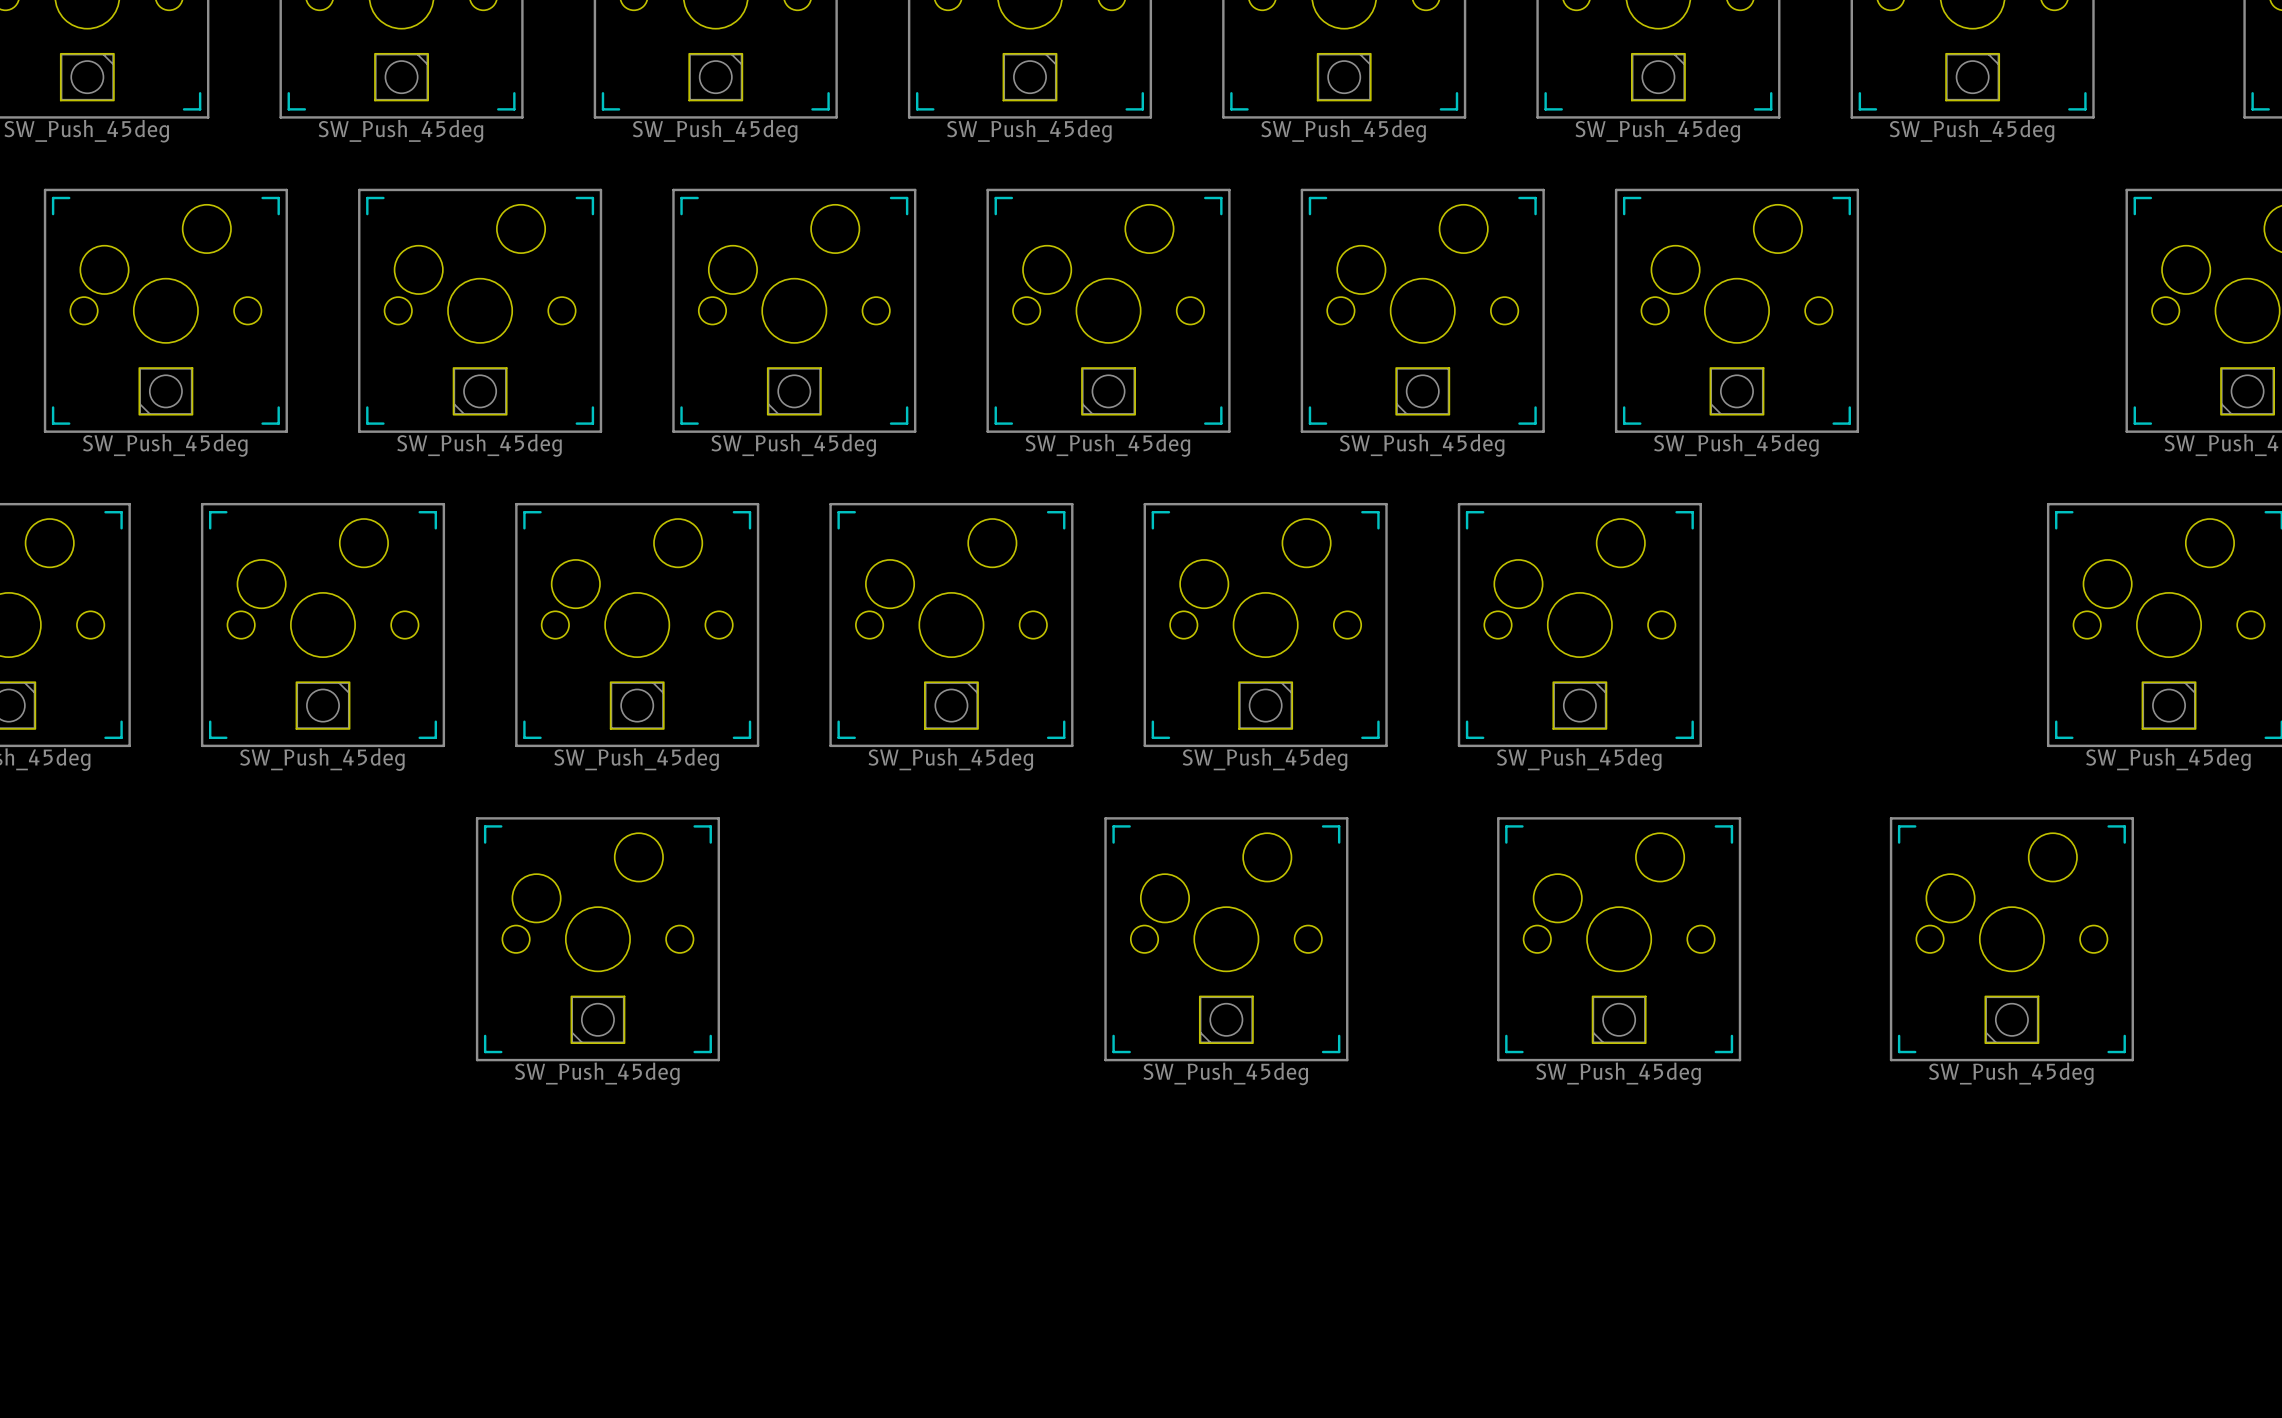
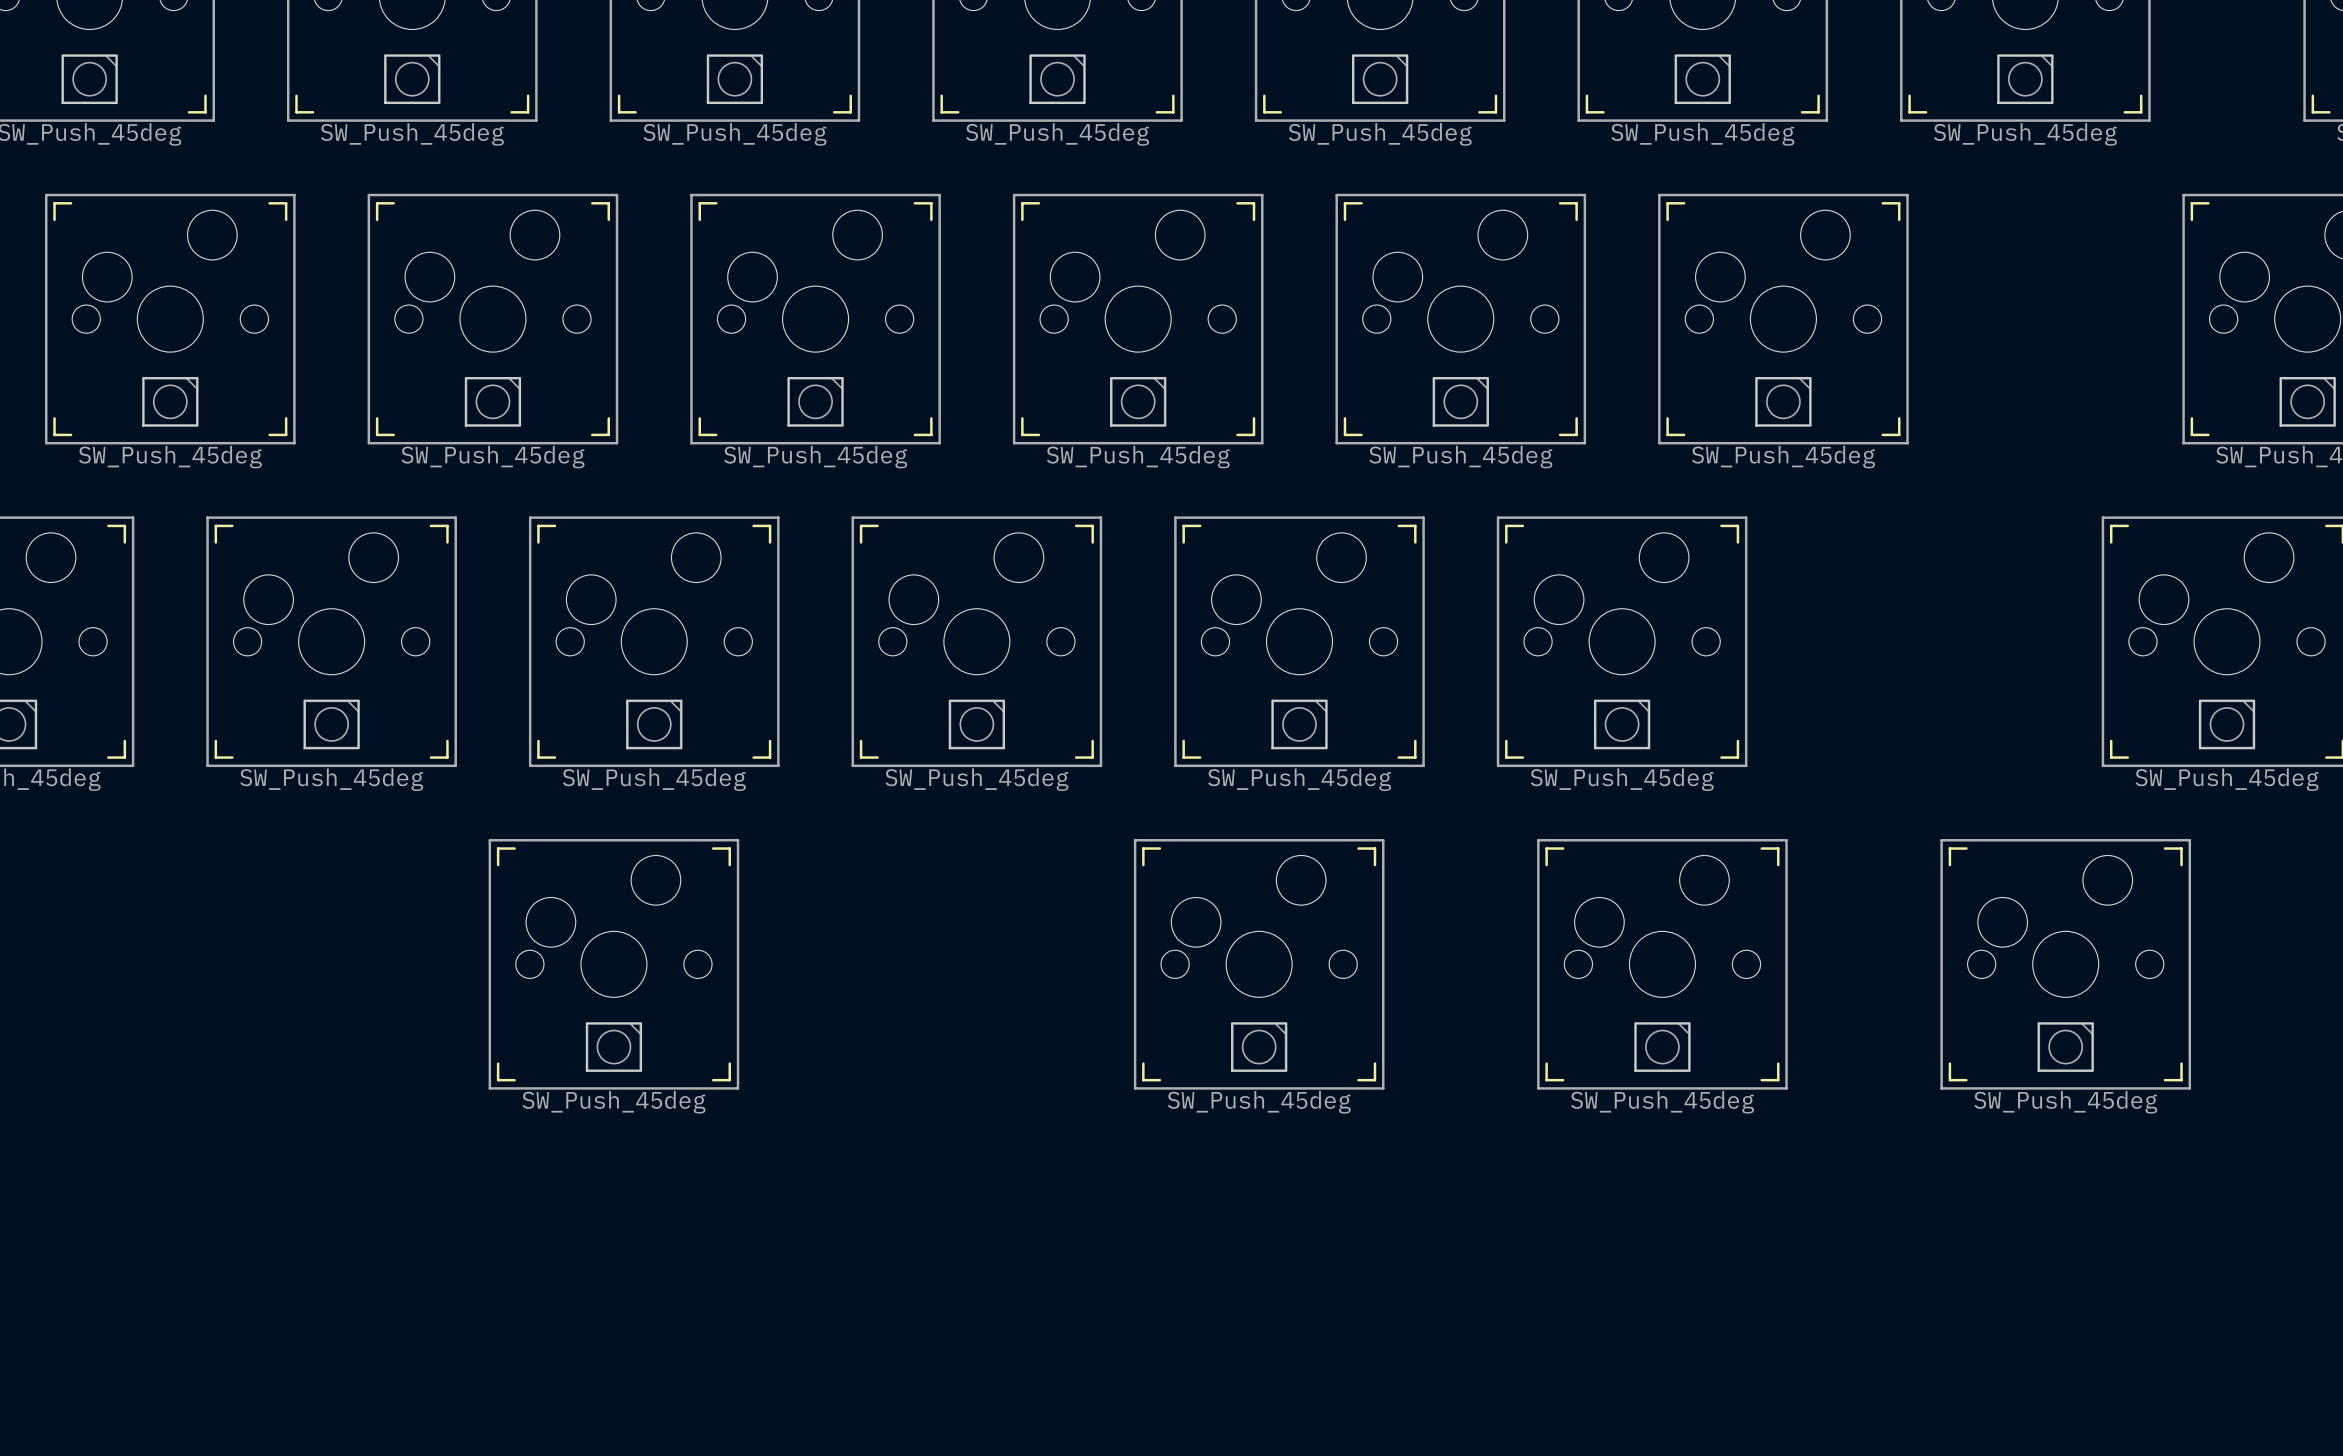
part rotation: 0° (165, 391) -> 180° (170, 401)
part rotation: 0° (480, 391) -> 180° (492, 401)
part rotation: 0° (794, 391) -> 180° (815, 401)
part rotation: 0° (1108, 391) -> 180° (1138, 401)
part rotation: 0° (1422, 391) -> 180° (1460, 401)
part rotation: 0° (1736, 391) -> 180° (1783, 401)
part rotation: 0° (2247, 391) -> 180° (2307, 401)
part rotation: 0° (597, 1019) -> 180° (613, 1047)
part rotation: 0° (1226, 1019) -> 180° (1259, 1047)
part rotation: 0° (1619, 1019) -> 180° (1662, 1047)
part rotation: 0° (2011, 1019) -> 180° (2065, 1047)

